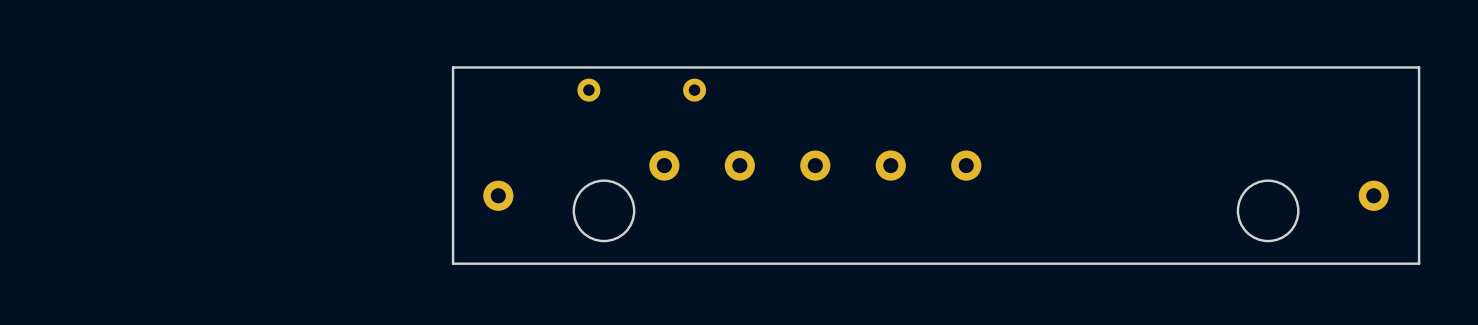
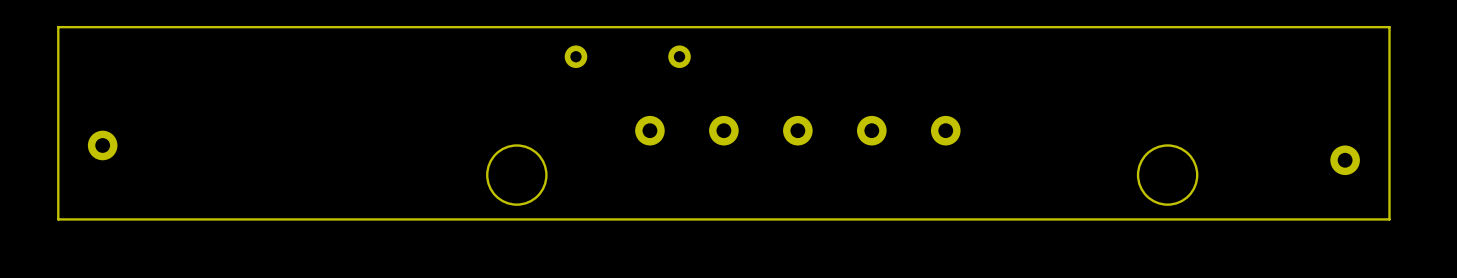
board edge: (1419, 67) (453, 67) (453, 263) (1419, 263) (1419, 256) -> (1389, 34) (1389, 27) (58, 27) (58, 219) (1389, 219)
part: none -> (102, 145)
part: (498, 195) -> none
round board edge position: (604, 210) -> (516, 175)
round board edge position: (1268, 210) -> (1167, 175)

